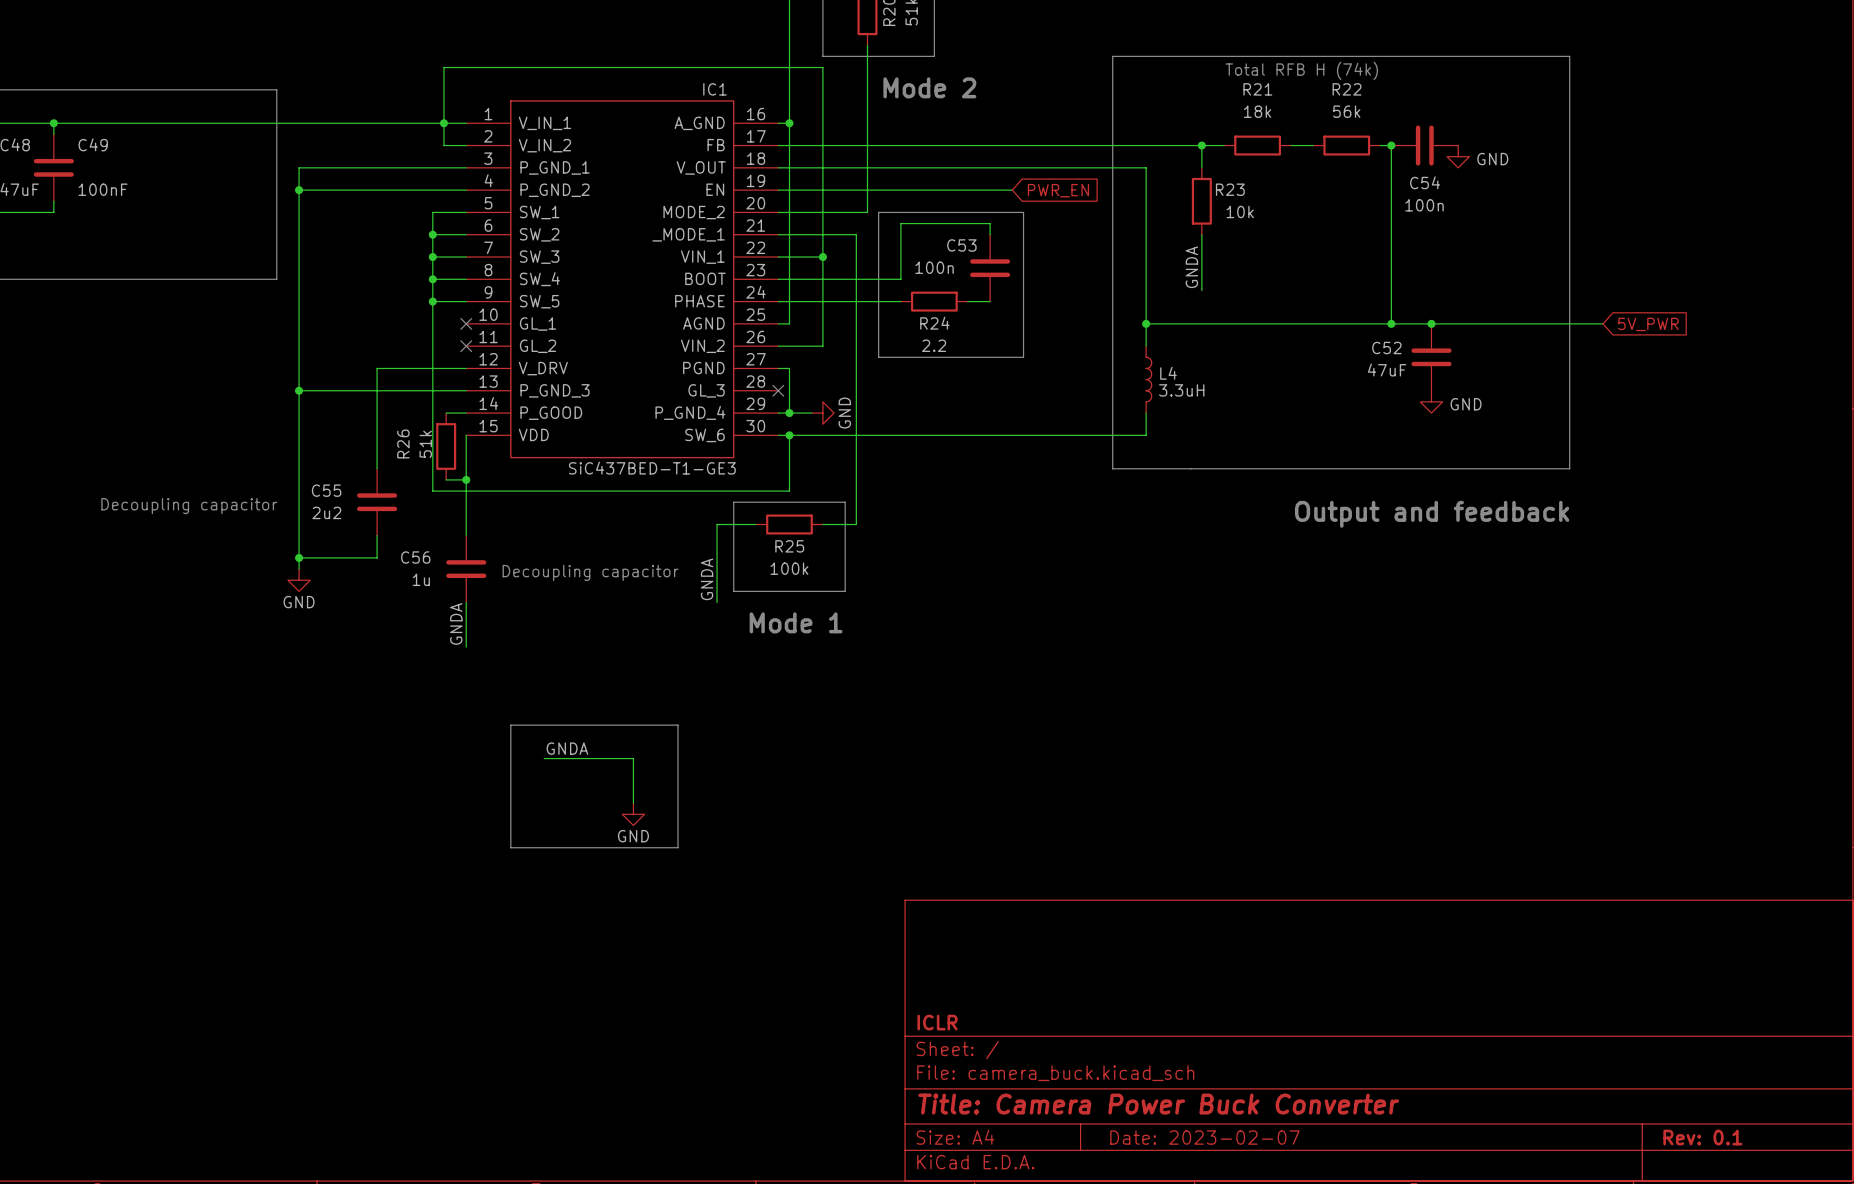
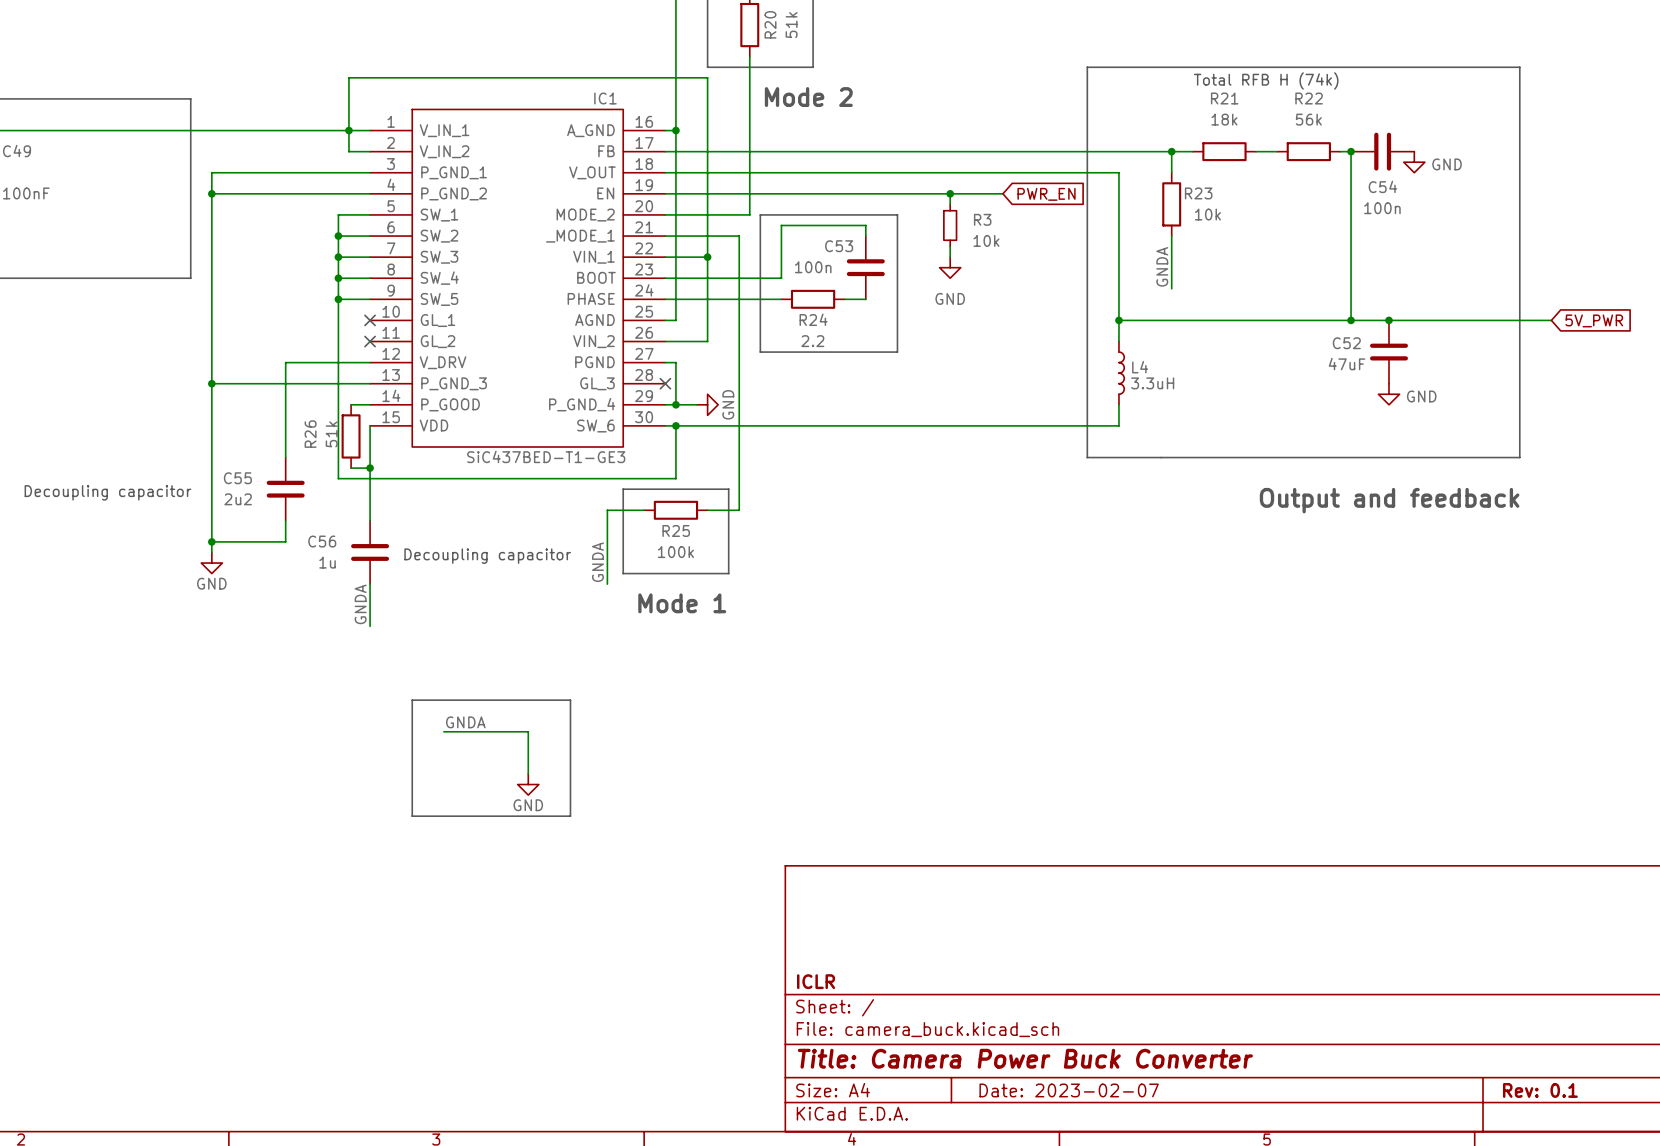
line: (1224, 56) (1112, 56) (1112, 468) (1224, 468) -> (1087, 67) (1087, 457)
line: (1569, 56) (1569, 468) -> (1414, 67) (1519, 67) (1519, 457) (1414, 457)
text position: Total RFB H (74k) (1301, 70) -> Total RFB H (74k) (1266, 80)
wire: (1201, 145) (1201, 167) -> none
junction: (1201, 145) -> none
wire: none -> (1087, 151) (1150, 151)
R21 position: (1257, 145) -> (1224, 151)
junction: none -> (1171, 151)
wire: none -> (1192, 151) (1171, 151) (1171, 172)
R22 position: (1346, 145) -> (1308, 151)
wire: (1380, 145) (1391, 145) (1391, 323) -> (1340, 151) (1351, 151) (1351, 320)
junction: (1391, 145) -> none
C54 position: (1424, 145) -> (1382, 151)
junction: none -> (1351, 151)
power symbol position: GND (1458, 156) -> GND (1414, 162)
wire: (1146, 167) (1146, 346) -> (1013, 172) (1118, 172) (1118, 341)
wire: none -> (886, 193) (1002, 193)
global label position: PWR_EN (1058, 190) -> PWR_EN (1046, 194)
wire: none -> (950, 193) (950, 204)
junction: none -> (950, 193)
R23 position: (1201, 201) -> (1171, 204)
R3: none -> 10k (950, 225)
wire: (1201, 234) (1201, 290) -> (1171, 236) (1171, 288)
wire: none -> (950, 246) (950, 257)
label position: GNDA (1191, 267) -> GNDA (1162, 266)
power symbol: none -> GND (950, 267)
wire: (1146, 323) (1257, 323) -> none
junction: (1146, 323) -> none
junction: none -> (1118, 320)
junction: (1391, 323) -> none
junction: (1431, 323) -> none
junction: none -> (1351, 320)
junction: none -> (1389, 320)
wire: none -> (1445, 320) (1551, 320)
global label position: 5V_PWR (1648, 324) -> 5V_PWR (1594, 320)
C52 position: (1431, 357) -> (1389, 352)
L4 position: (1148, 379) -> (1121, 373)
power symbol position: GND (1431, 401) -> GND (1389, 394)
wire: (1146, 413) (1146, 435) -> (1118, 404) (1118, 425) (1013, 425)
text position: Output and feedback (1432, 514) -> Output and feedback (1389, 500)

